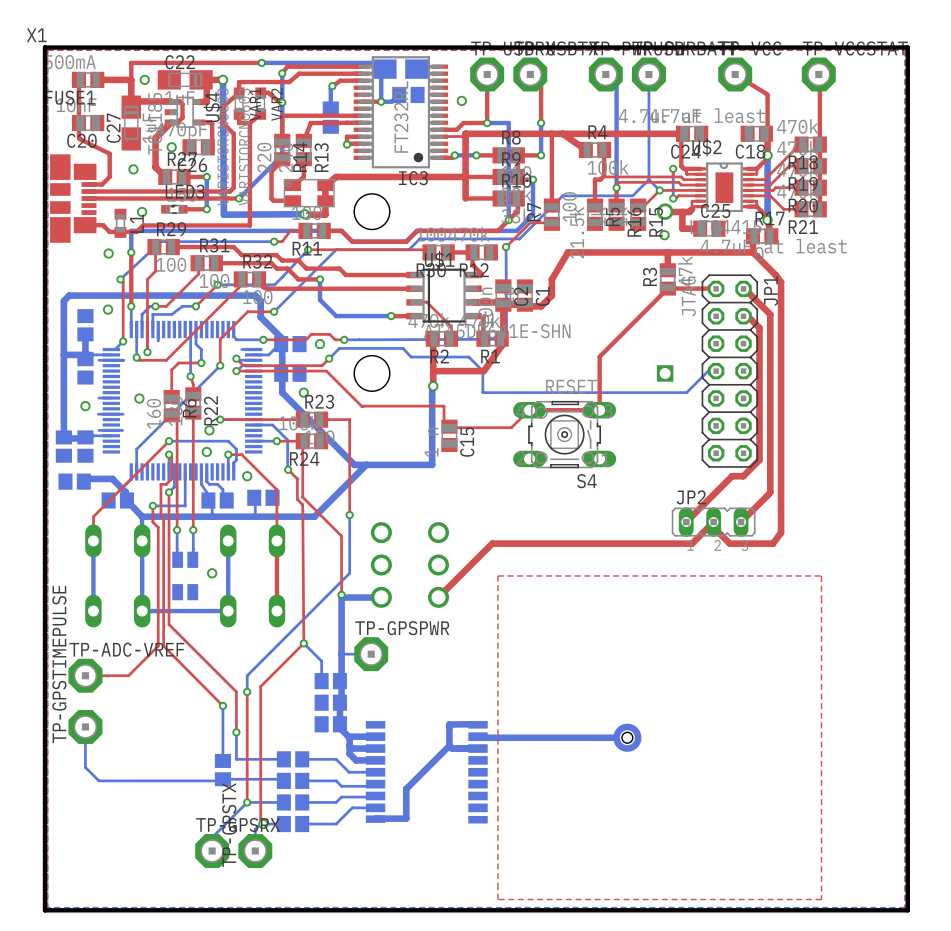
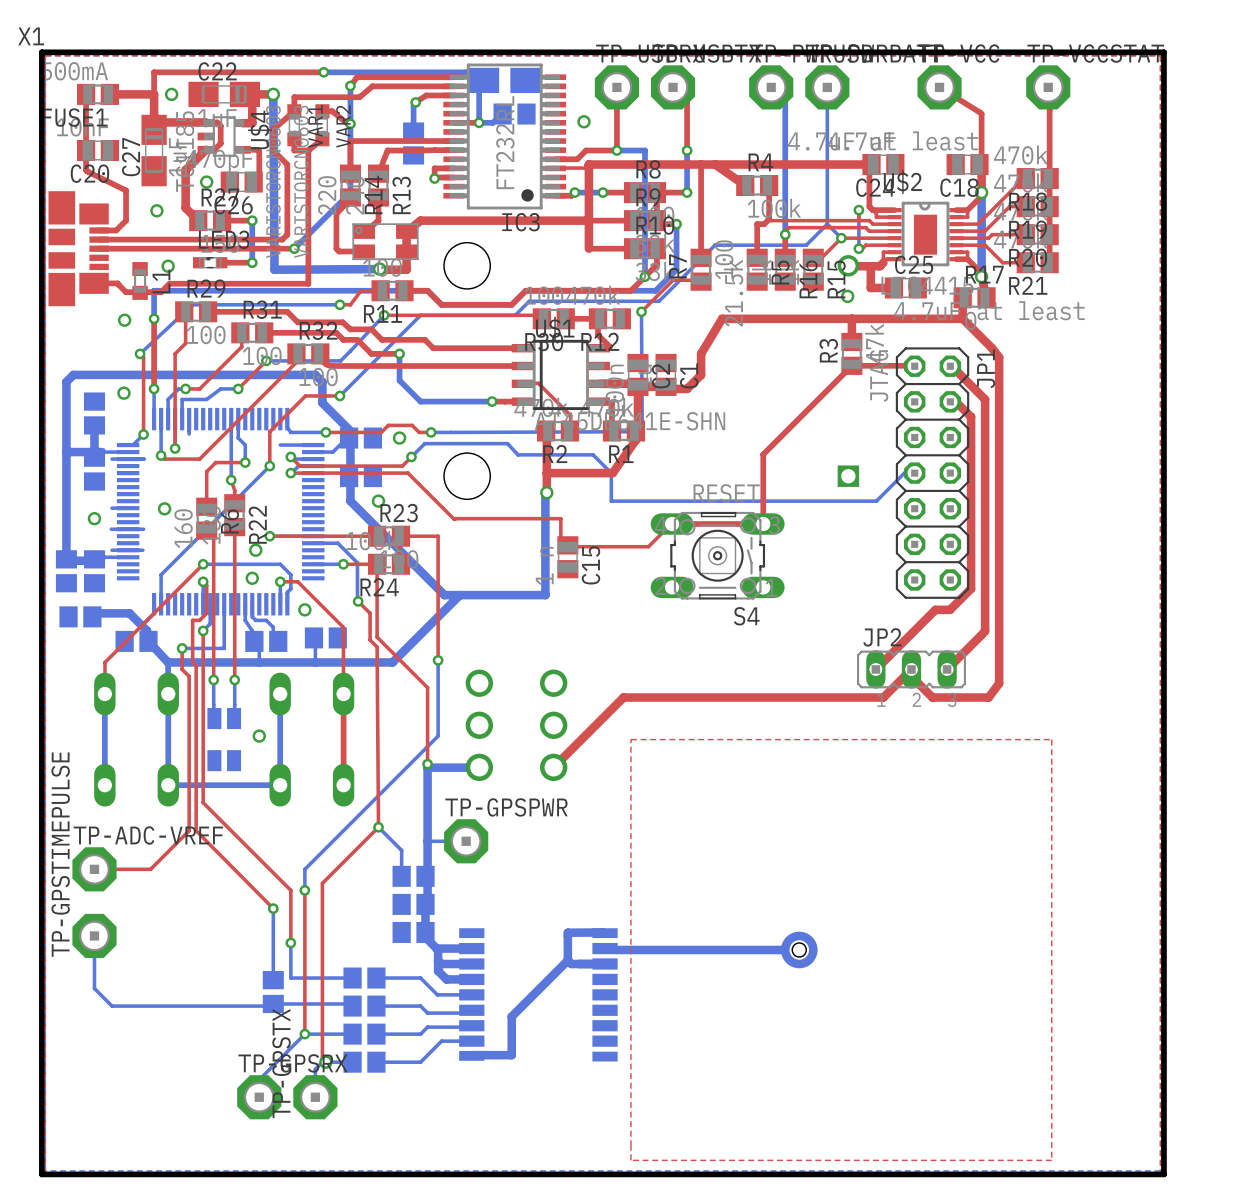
bottom track: none -> (280, 445) (297, 445)

